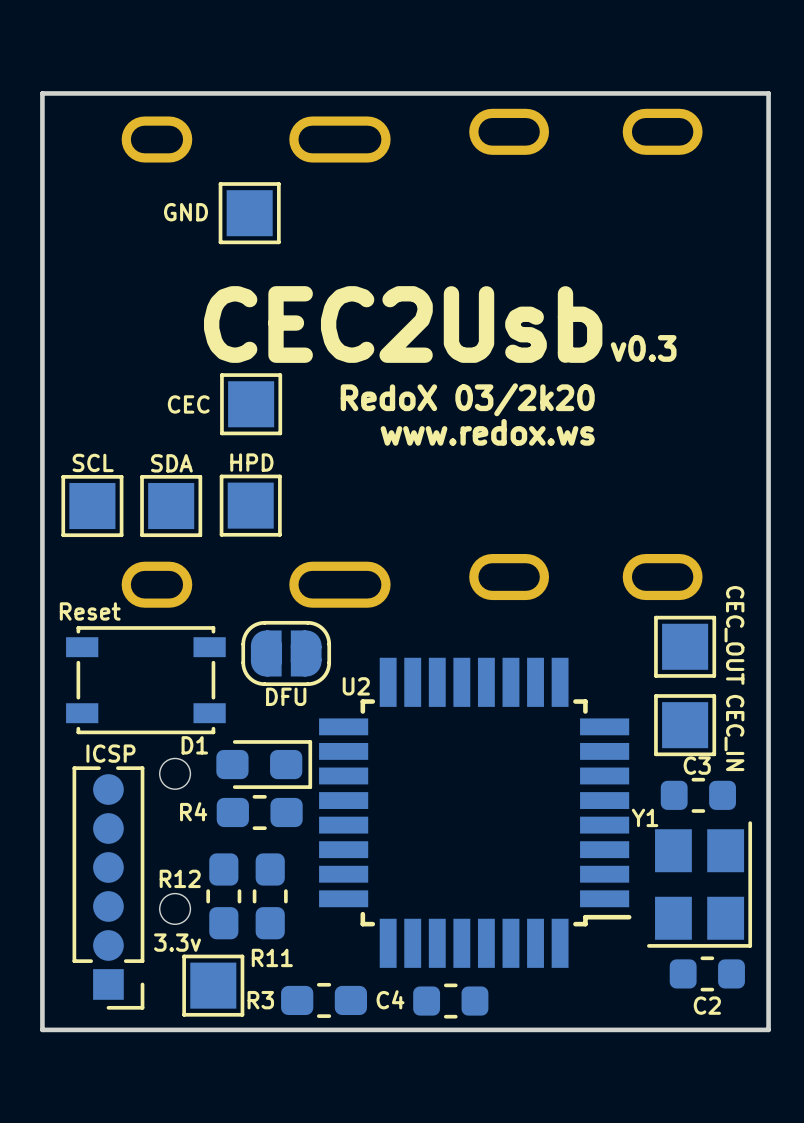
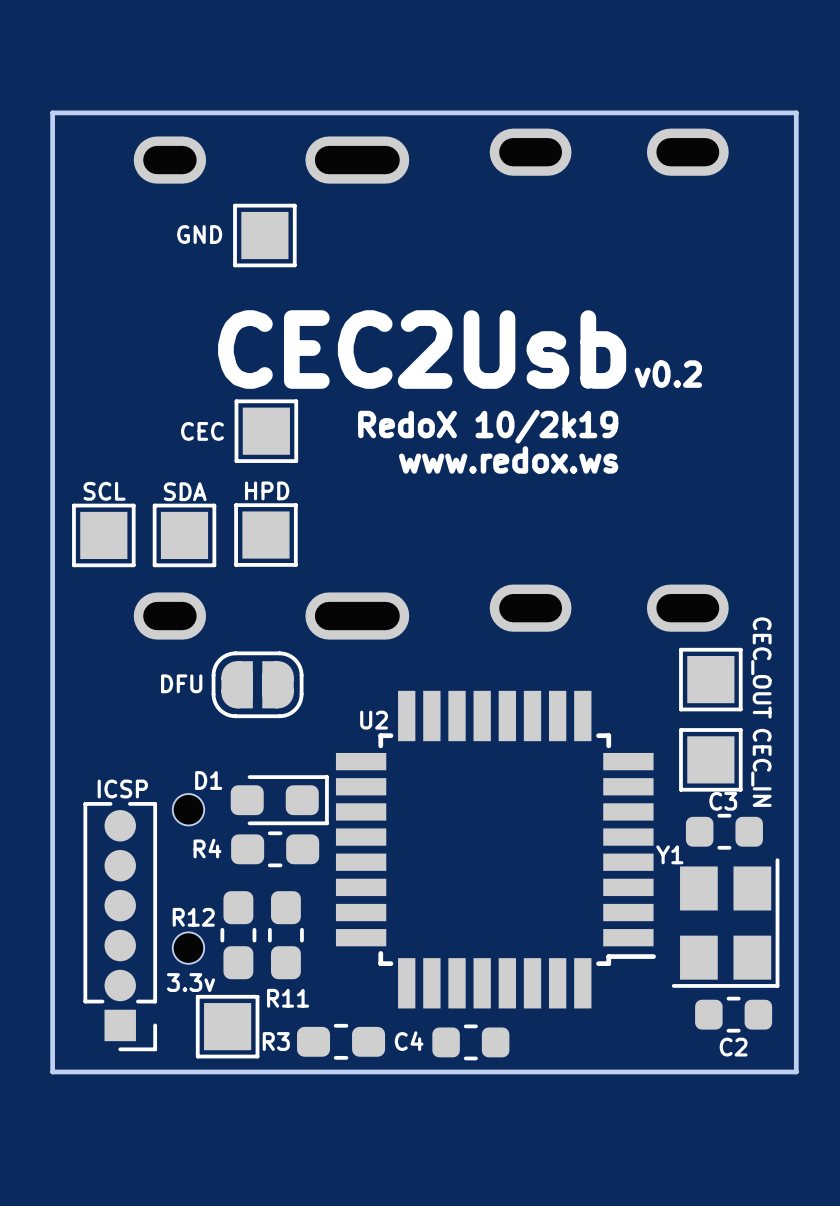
text: v0.3 (643, 348) -> v0.2 (668, 374)
text: RedoX 03/2k20 (467, 399) -> RedoX 10/2k19 (488, 426)
part position: (286, 653) -> (257, 684)
Reset: (145, 680) -> none
part value position: DFU (286, 696) -> DFU (181, 683)

